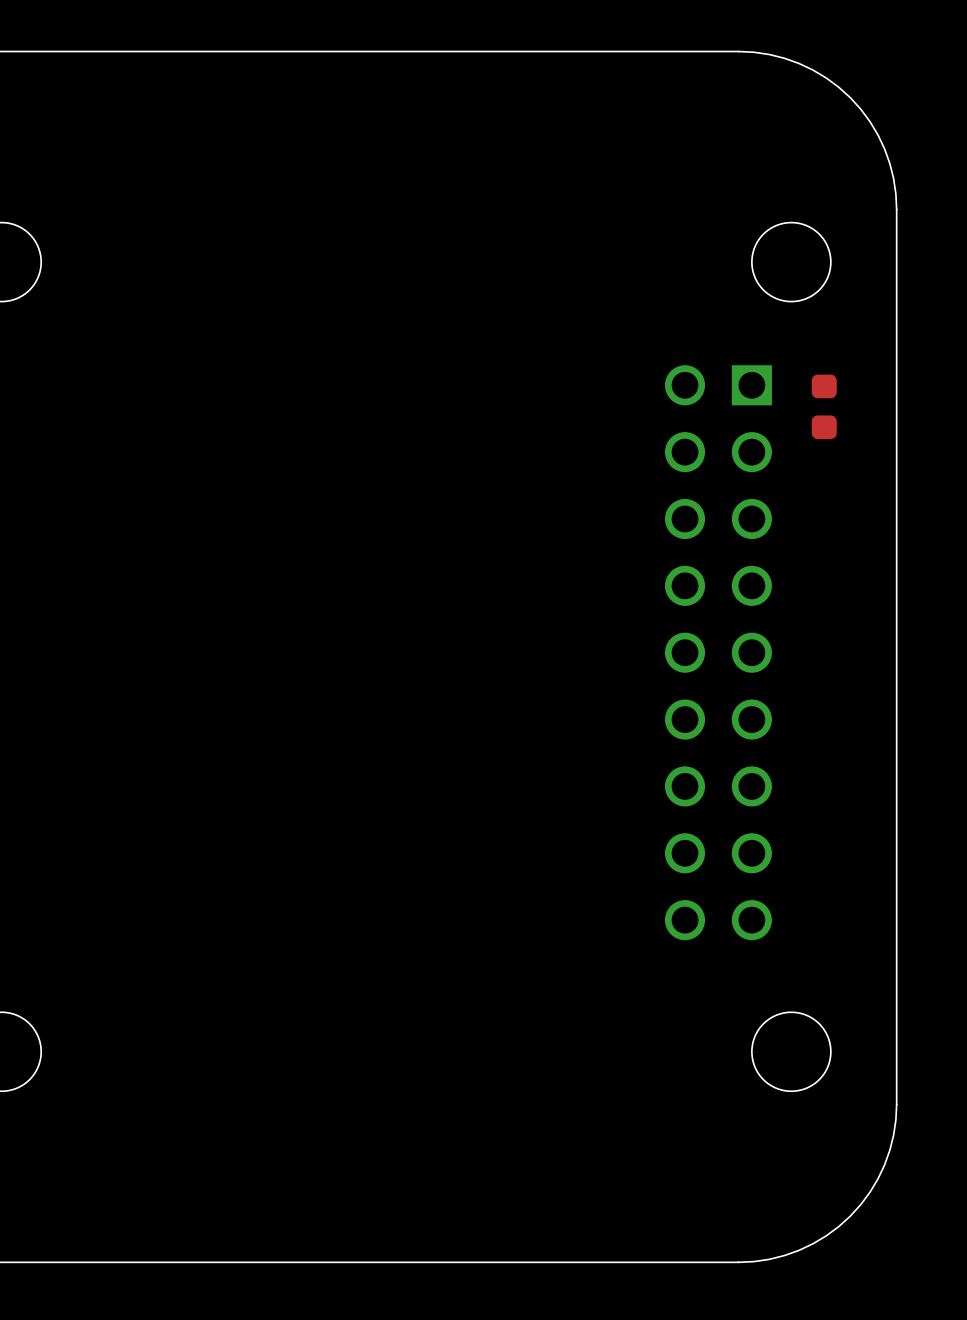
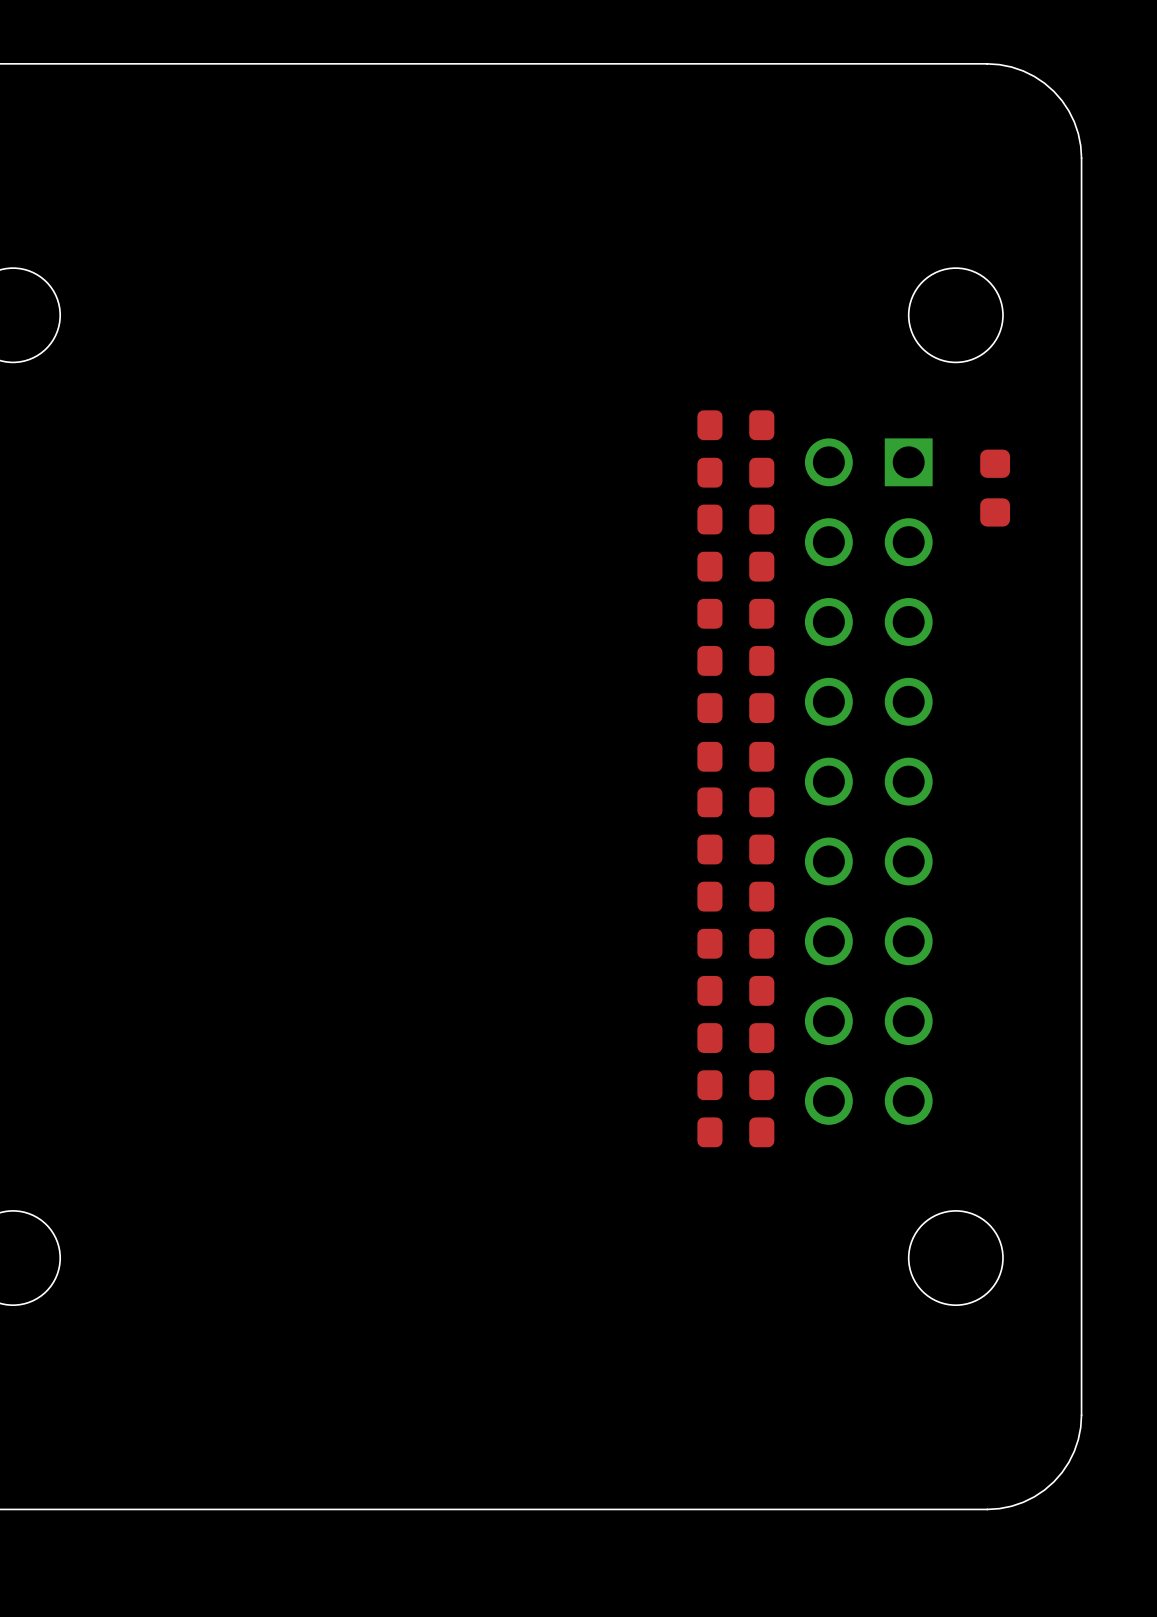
board edge: (738, 51) (769, 54) (799, 63) (826, 78) (850, 97) (870, 121) (884, 149) (893, 178) (896, 209) -> (892, 63) (999, 64) (1023, 71) (1034, 76) (1053, 91) (1062, 100) (1074, 122) (1080, 145) (1081, 252)
part: none -> (735, 425)
part: none -> (735, 472)
part: none -> (735, 519)
part: none -> (735, 566)
part: none -> (735, 613)
part: none -> (735, 660)
part: none -> (735, 708)
part: none -> (735, 756)
part: none -> (735, 802)
part: none -> (735, 849)
part: none -> (735, 896)
part: none -> (735, 943)
part: none -> (735, 990)
part: none -> (735, 1038)
part: none -> (735, 1085)
part: none -> (735, 1132)
board edge: (896, 1104) (893, 1135) (884, 1164) (870, 1192) (850, 1216) (826, 1235) (799, 1250) (769, 1259) (738, 1262) -> (1081, 1320) (1080, 1427) (1078, 1439) (1068, 1462) (1053, 1481) (1044, 1489) (1023, 1502) (999, 1508) (892, 1509)

